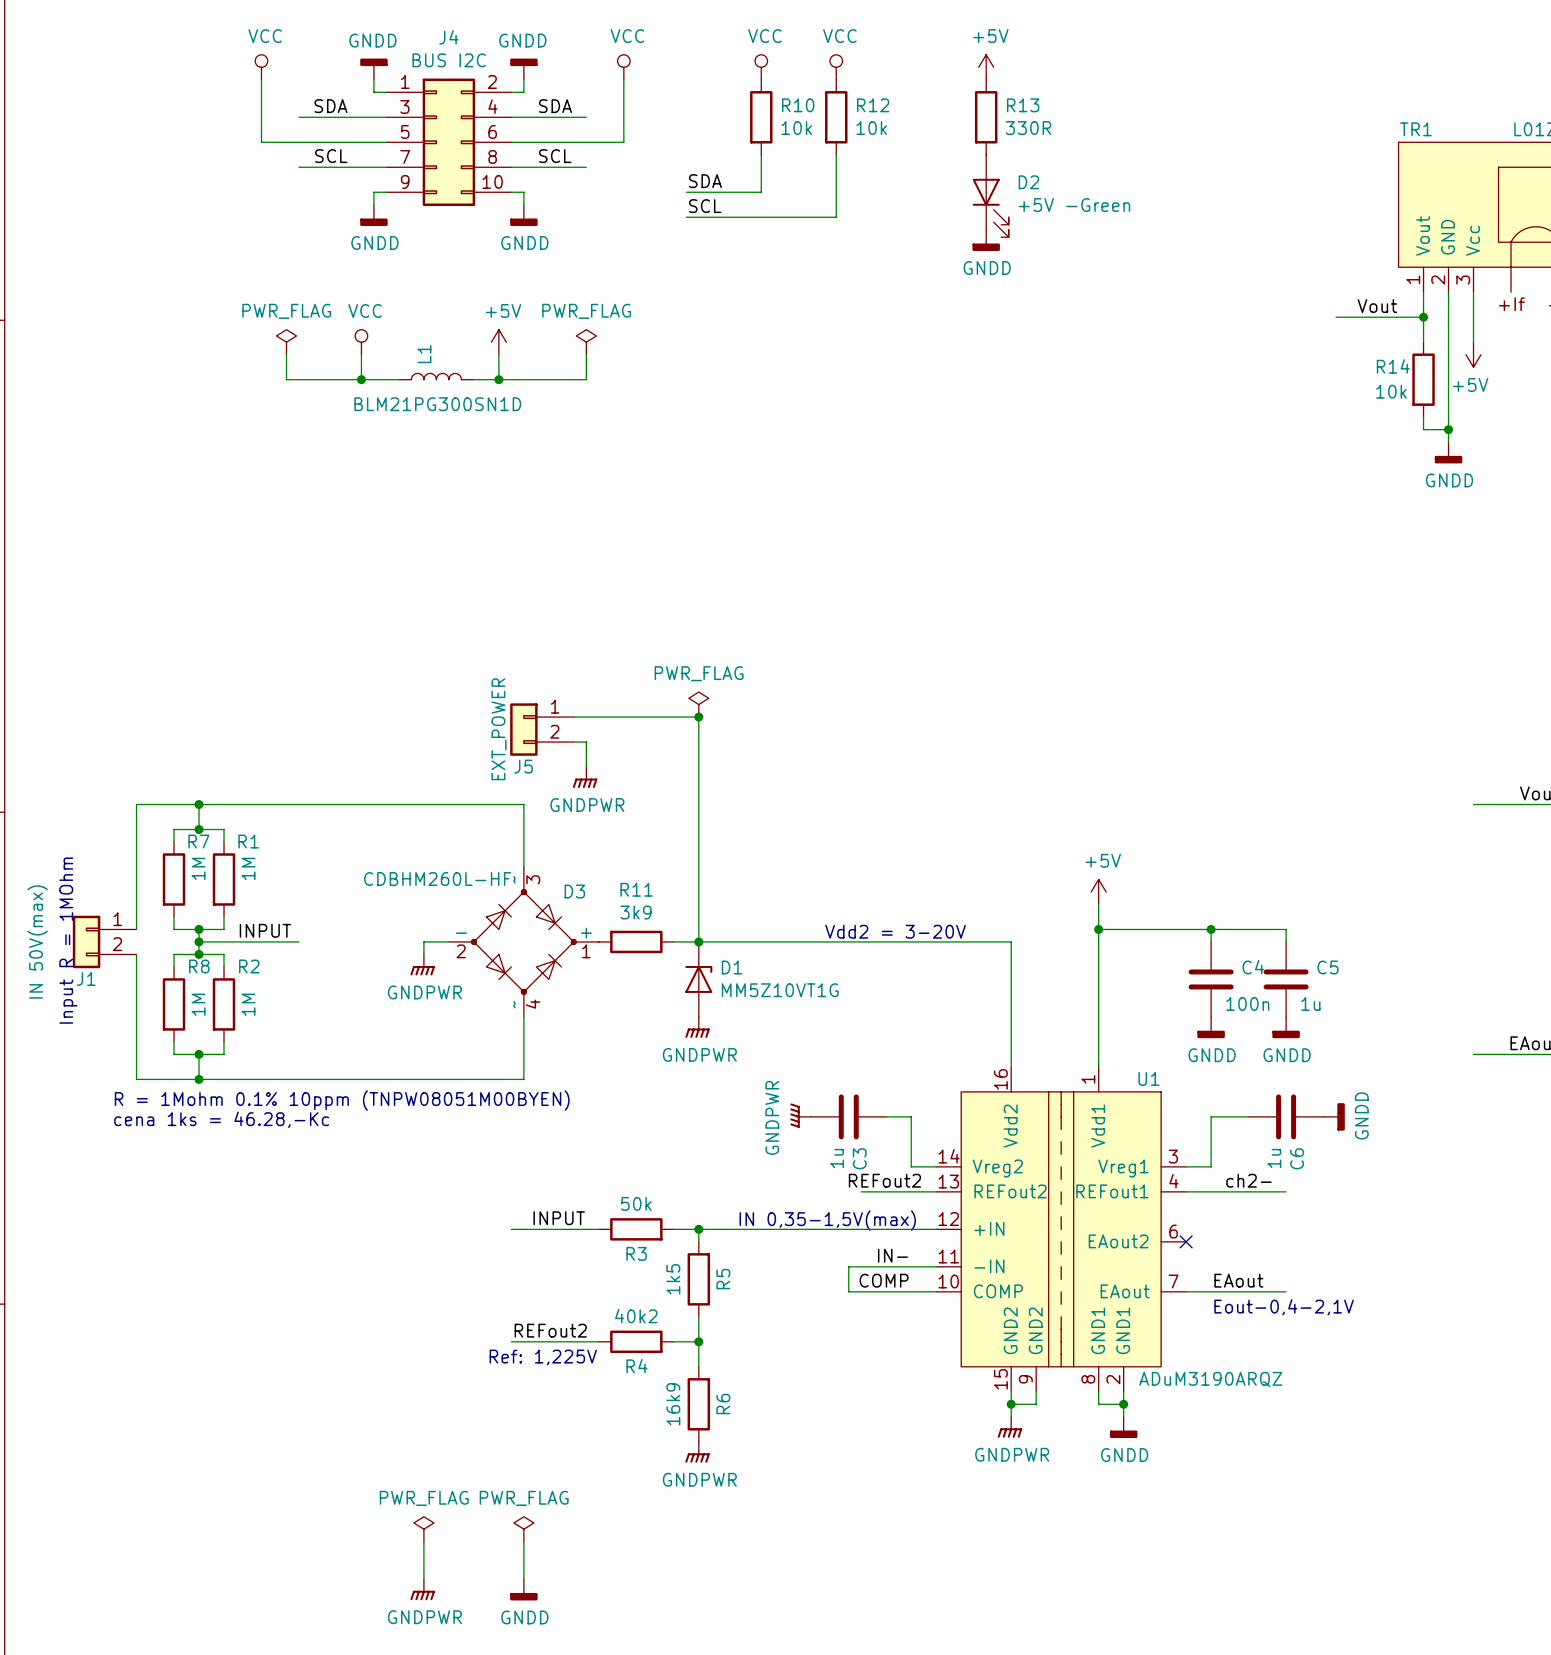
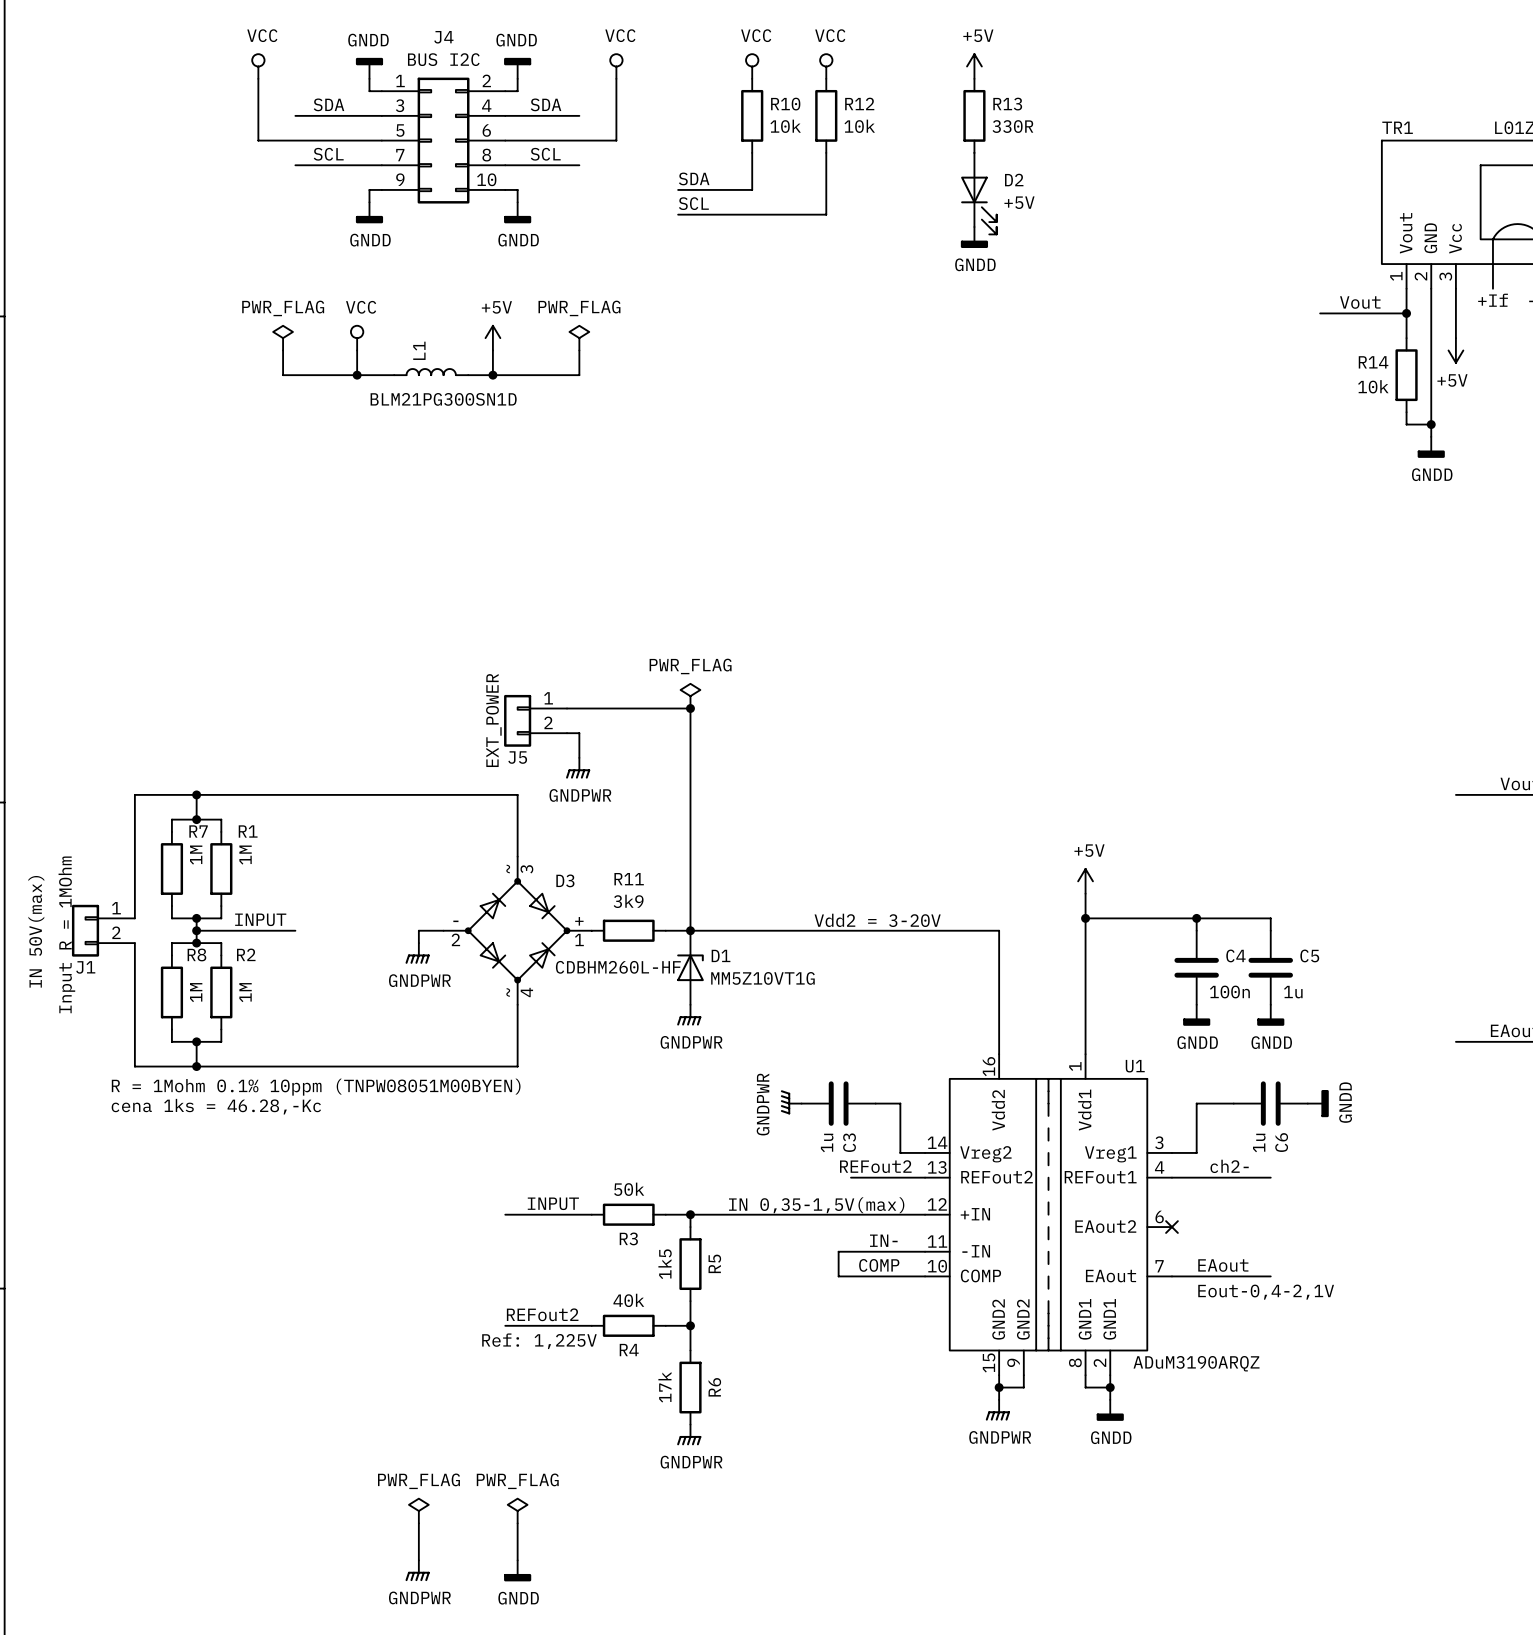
D2 value: +5V -Green (1074, 205) -> +5V (1019, 202)
D3 value position: CDBHM260L-HF (437, 879) -> CDBHM260L-HF (618, 967)
R4 value: 40k2 (636, 1316) -> 40k (628, 1300)
R6 value: 16k9 (673, 1404) -> 17k (664, 1387)

